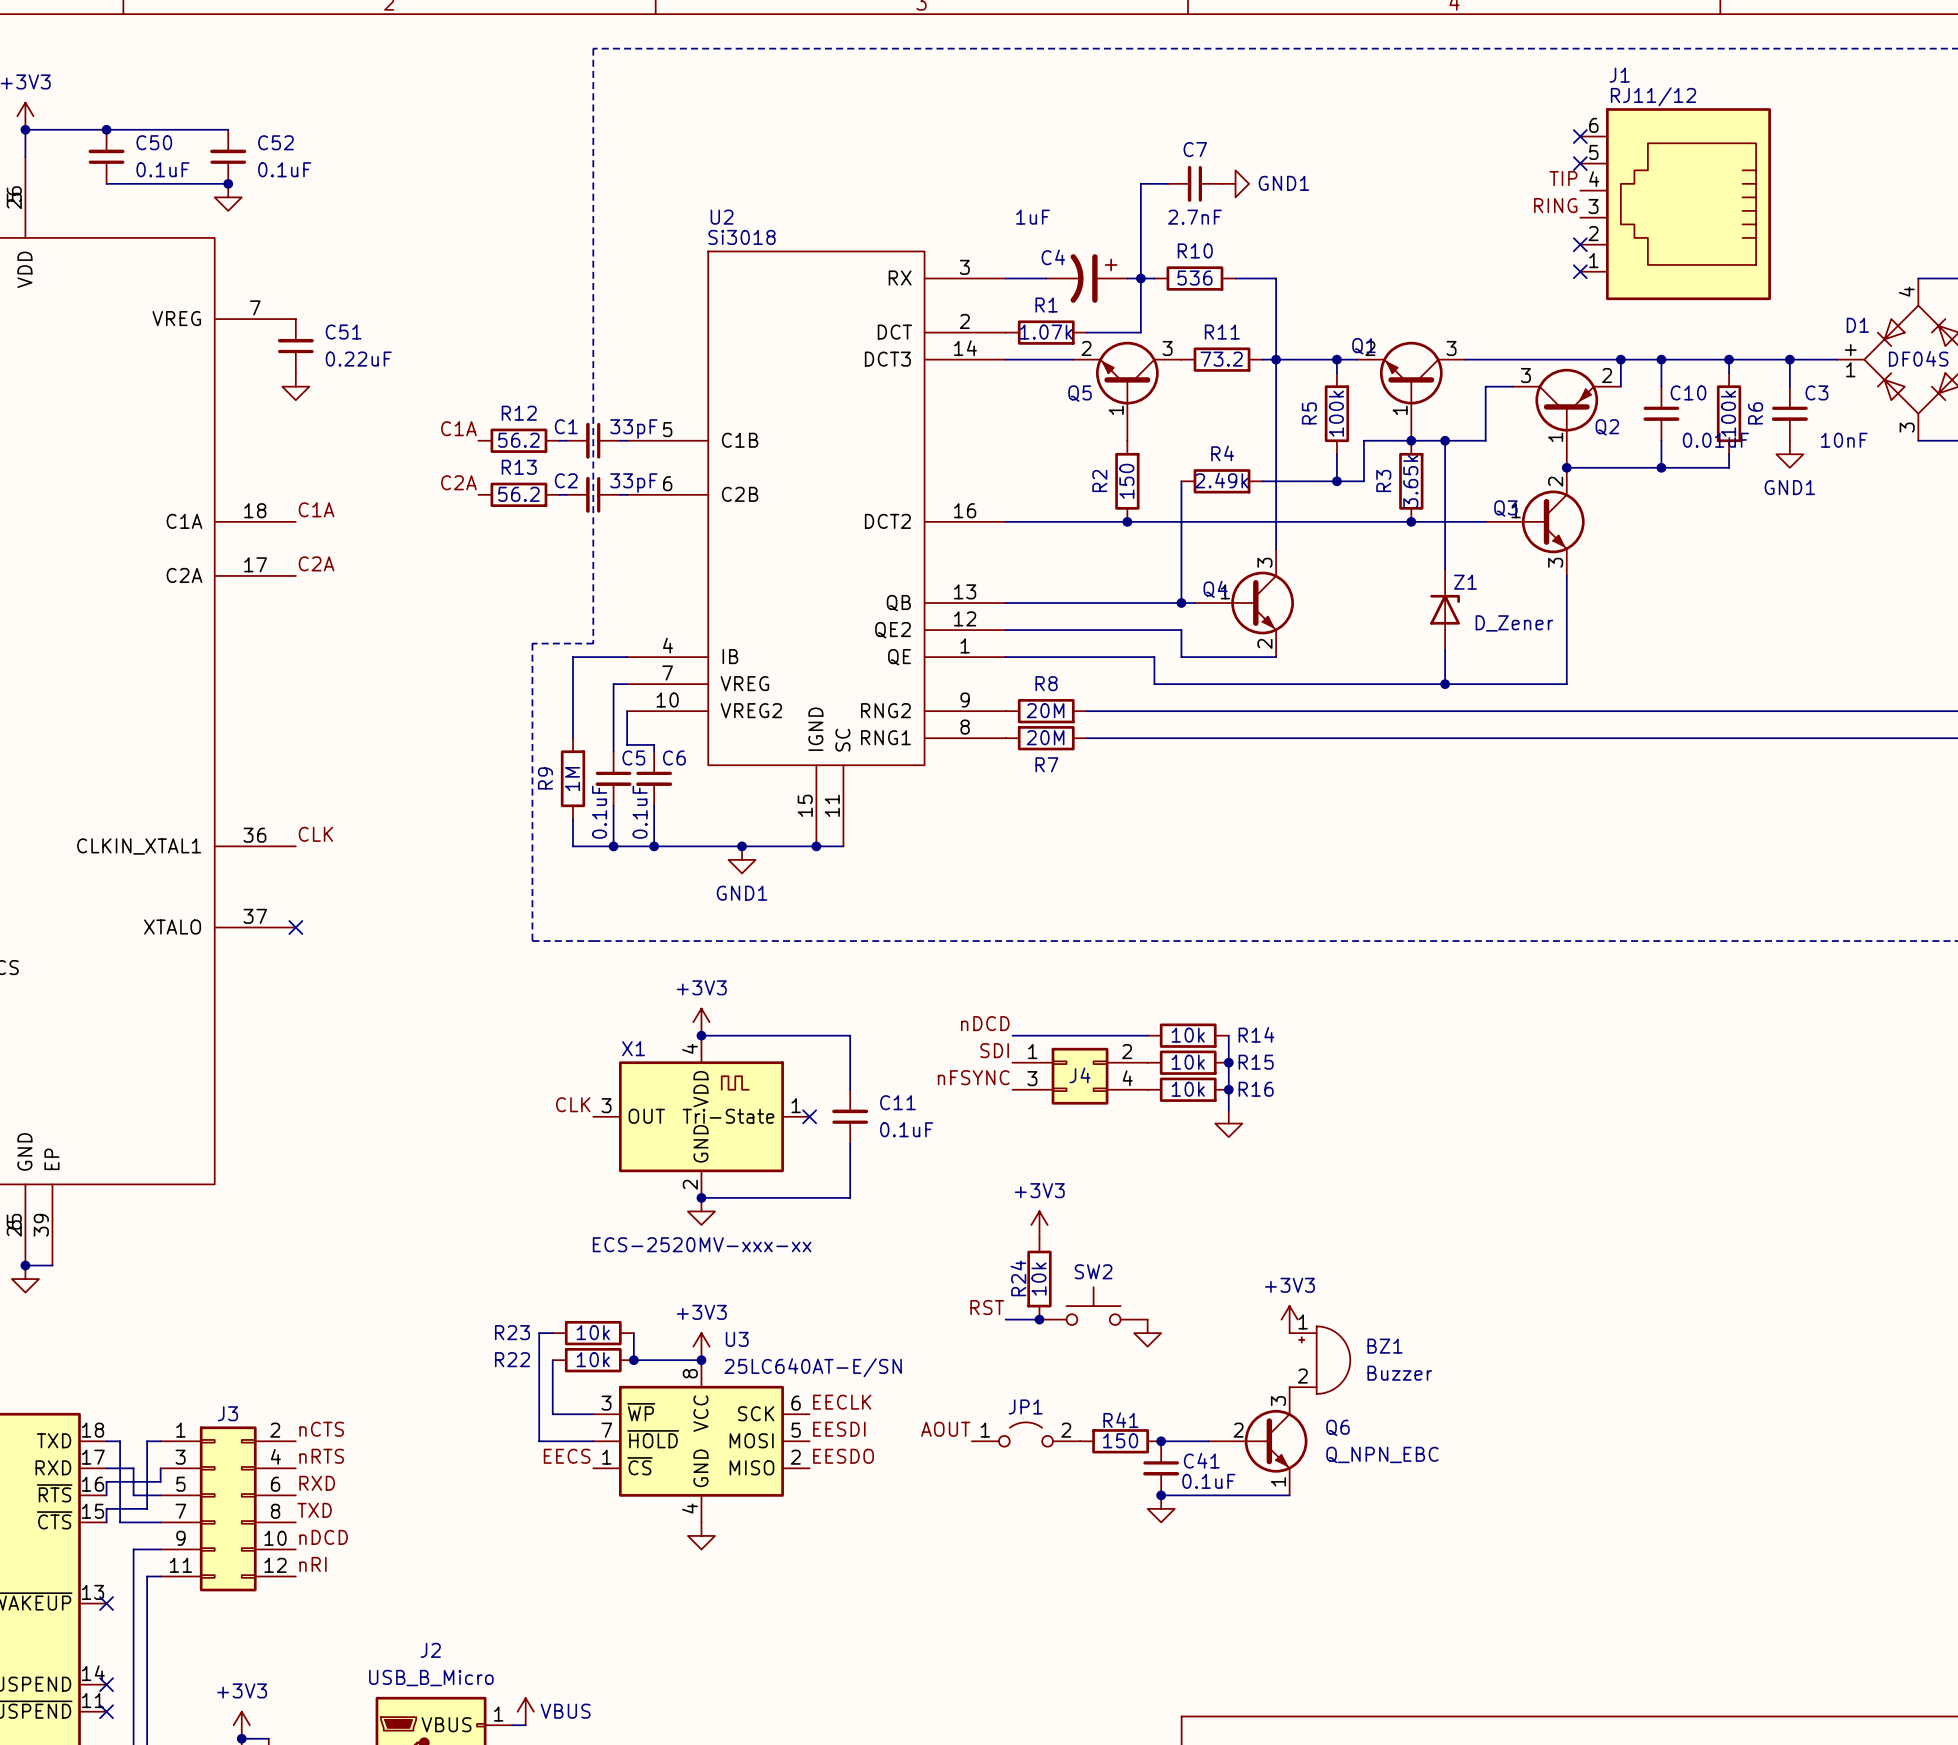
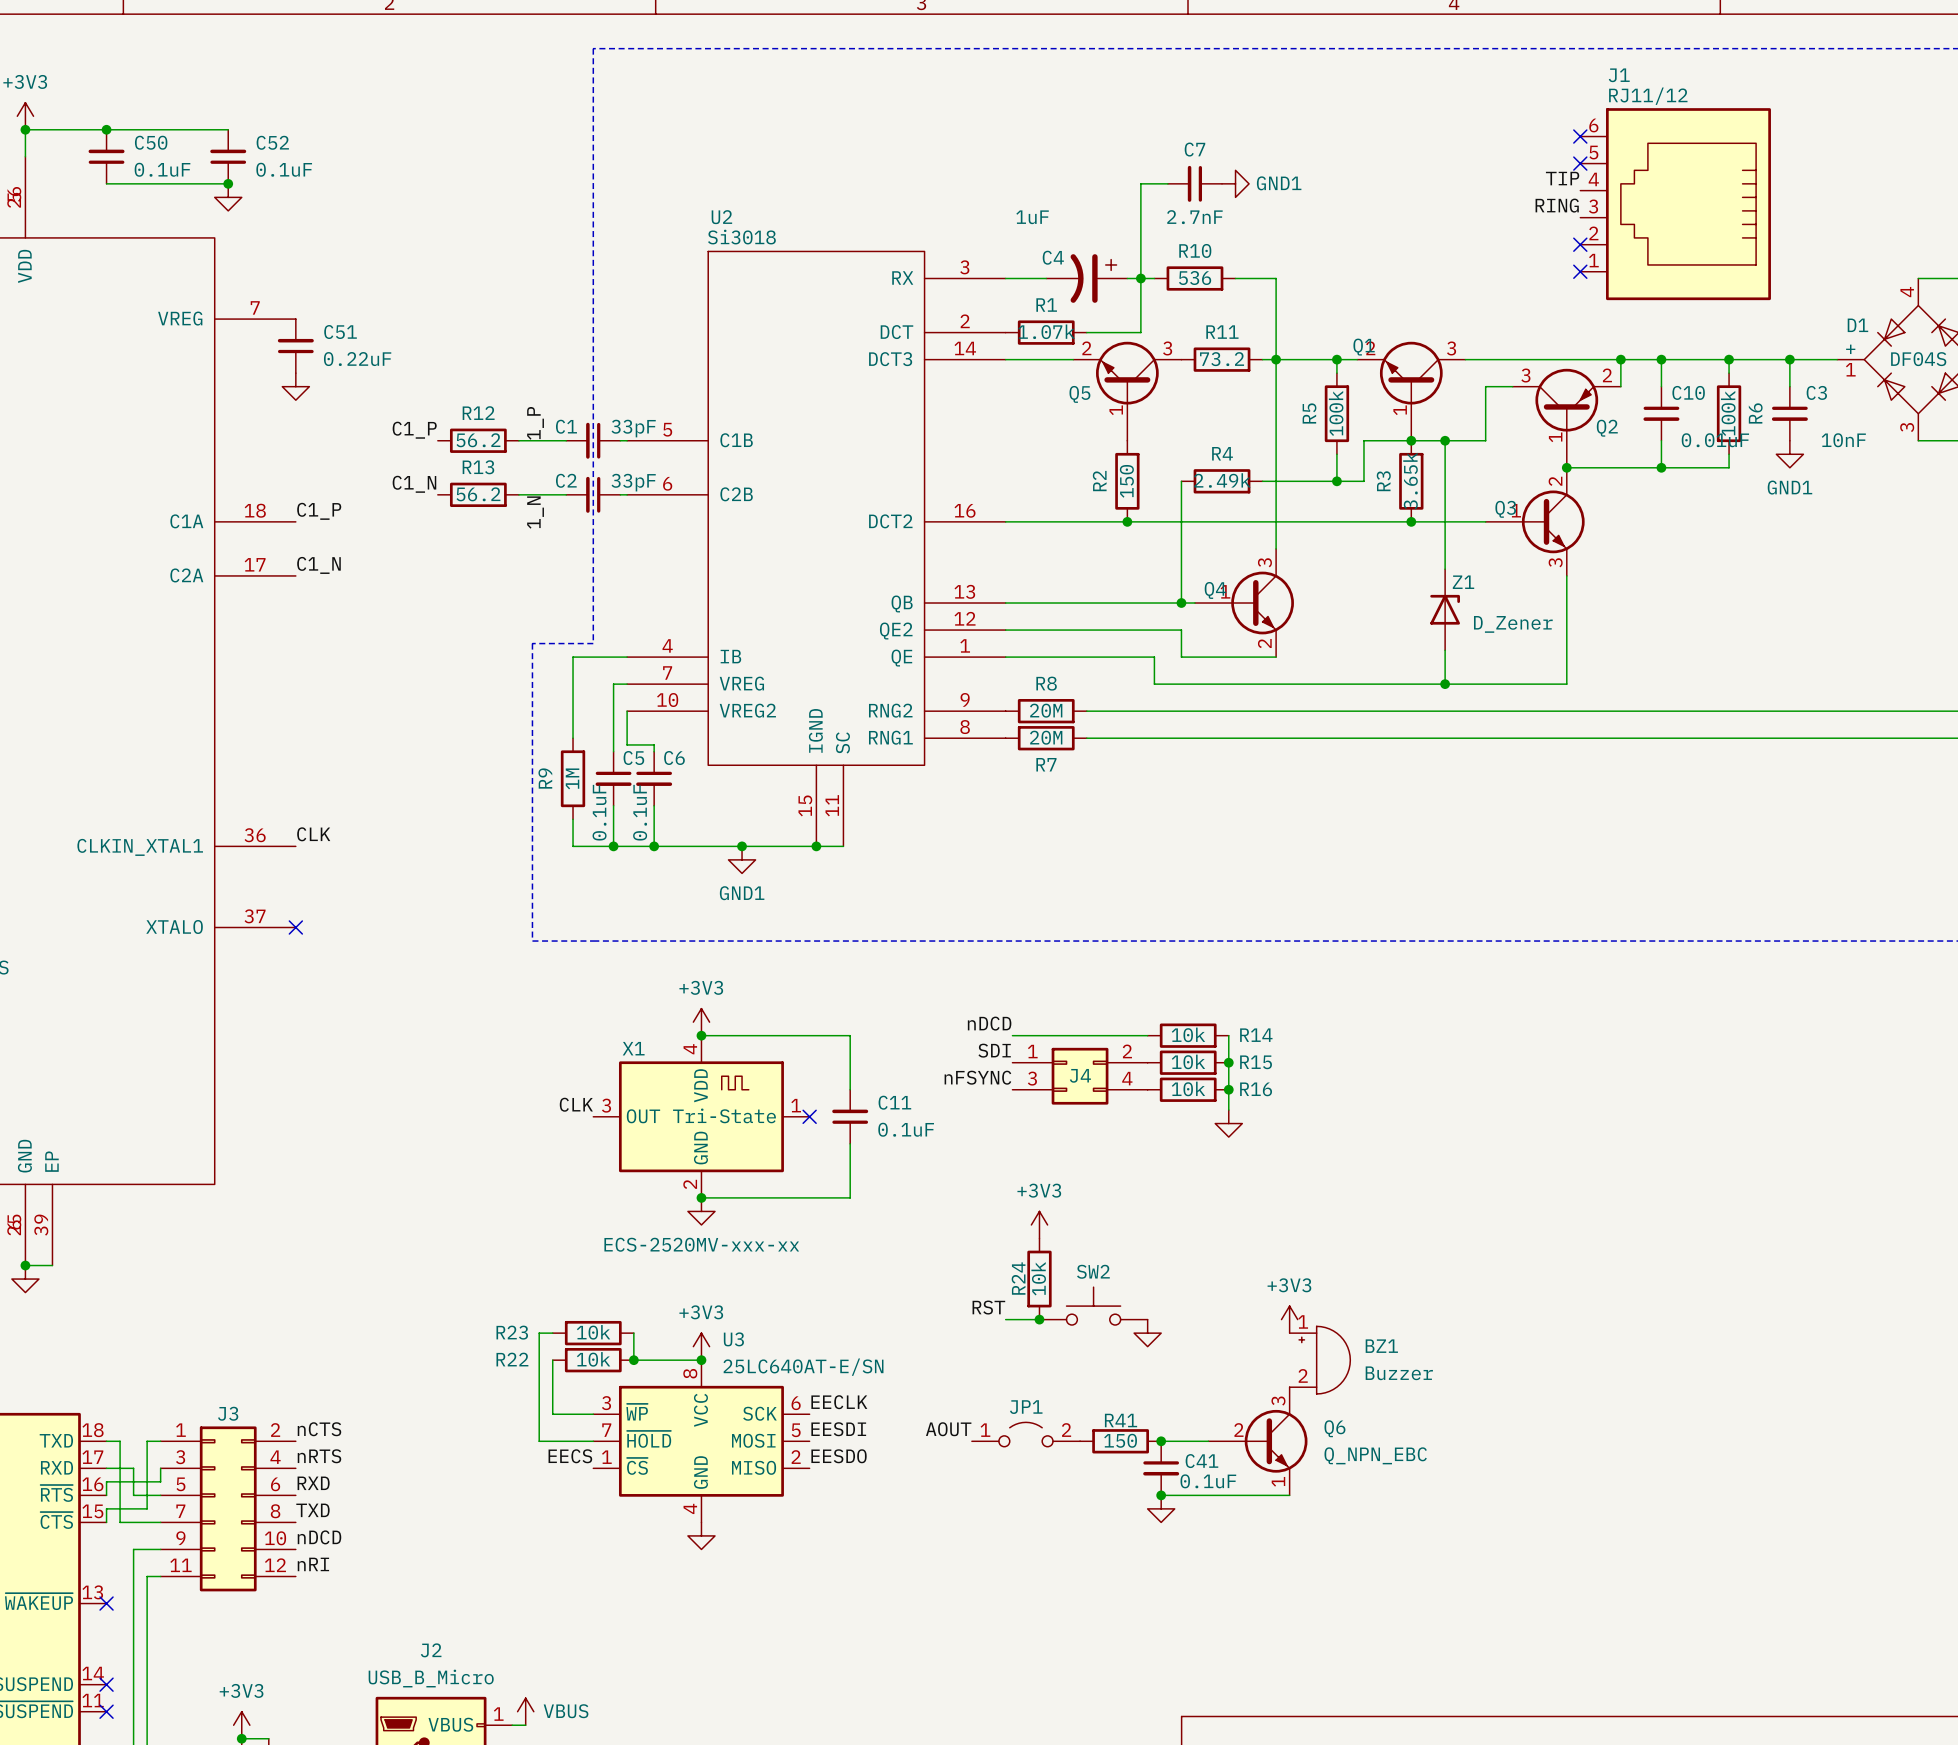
label: none -> 1_P (535, 423)
label: C1A (458, 428) -> none
label: none -> C1_P (414, 430)
wire: none -> (518, 440) (559, 440)
R12 position: (518, 440) -> (478, 440)
label: C2A (458, 482) -> none
label: none -> C1_N (414, 484)
wire: none -> (518, 494) (559, 494)
R13 position: (518, 494) -> (478, 494)
label: C1A (316, 509) -> C1_P (319, 511)
label: none -> 1_N (535, 512)
label: C2A (316, 563) -> C1_N (318, 565)

